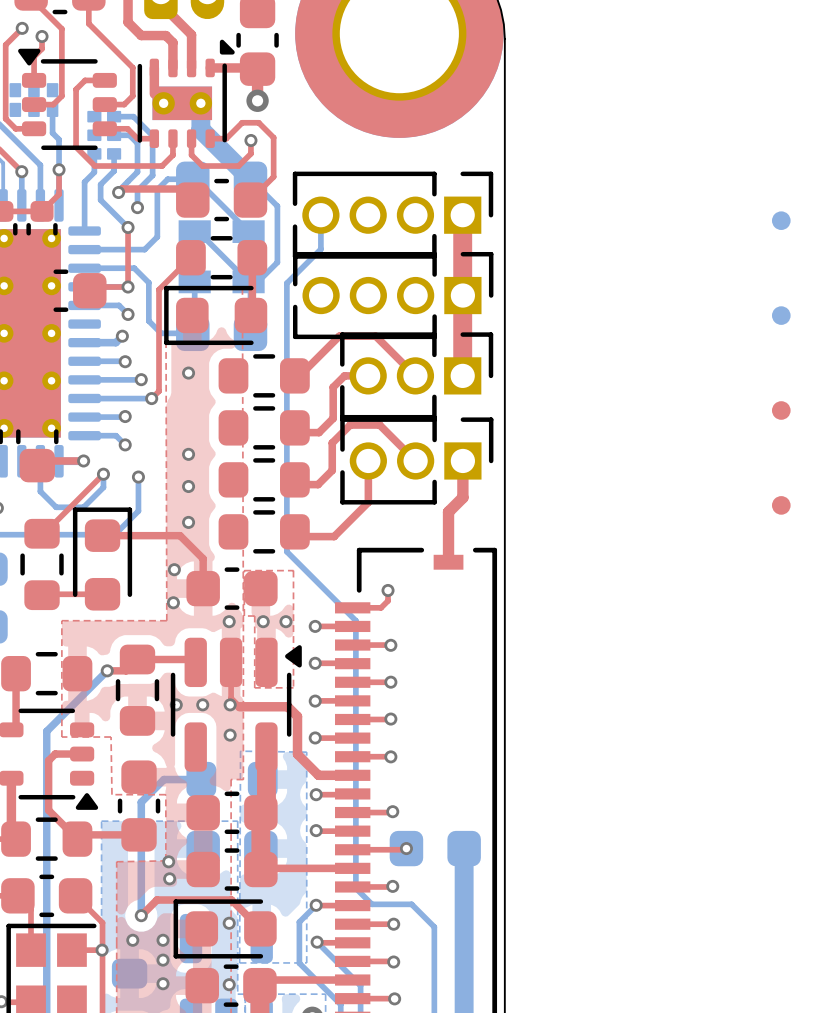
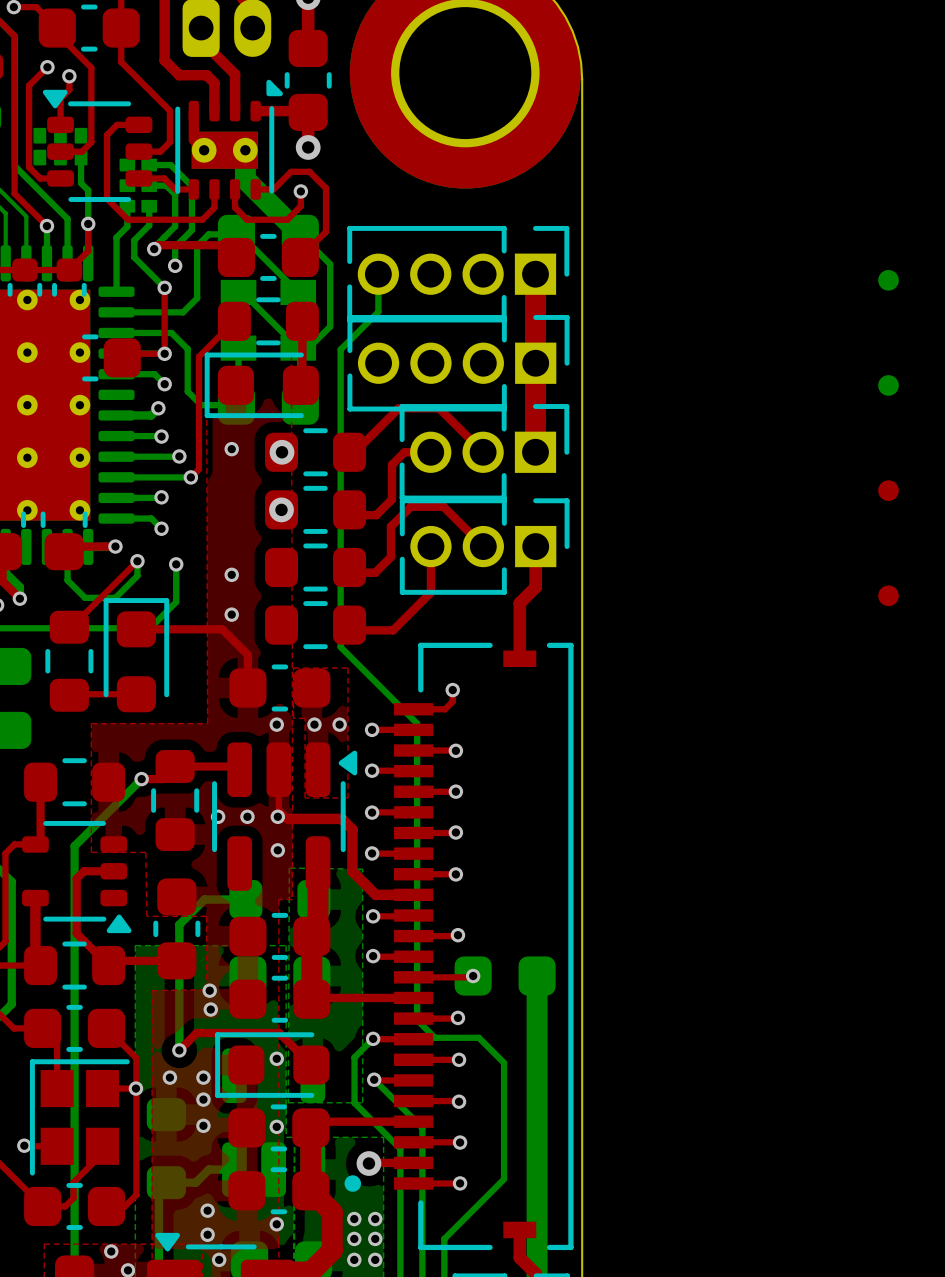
via: none -> (282, 452)
via: none -> (281, 509)
via: (188, 454) -> none
via: (174, 569) -> none
via: (173, 602) -> none

